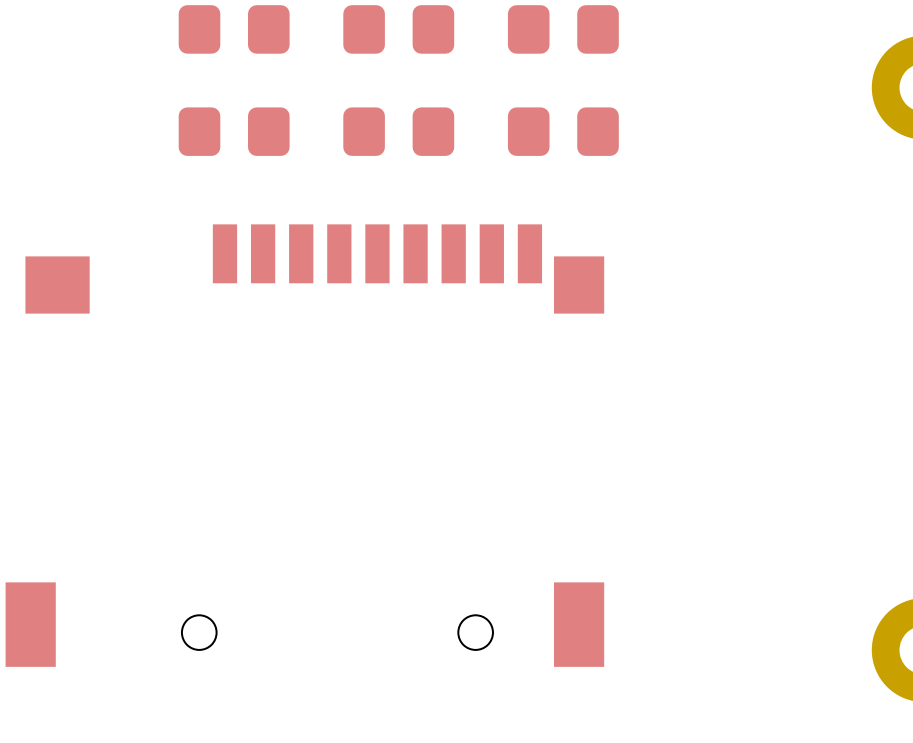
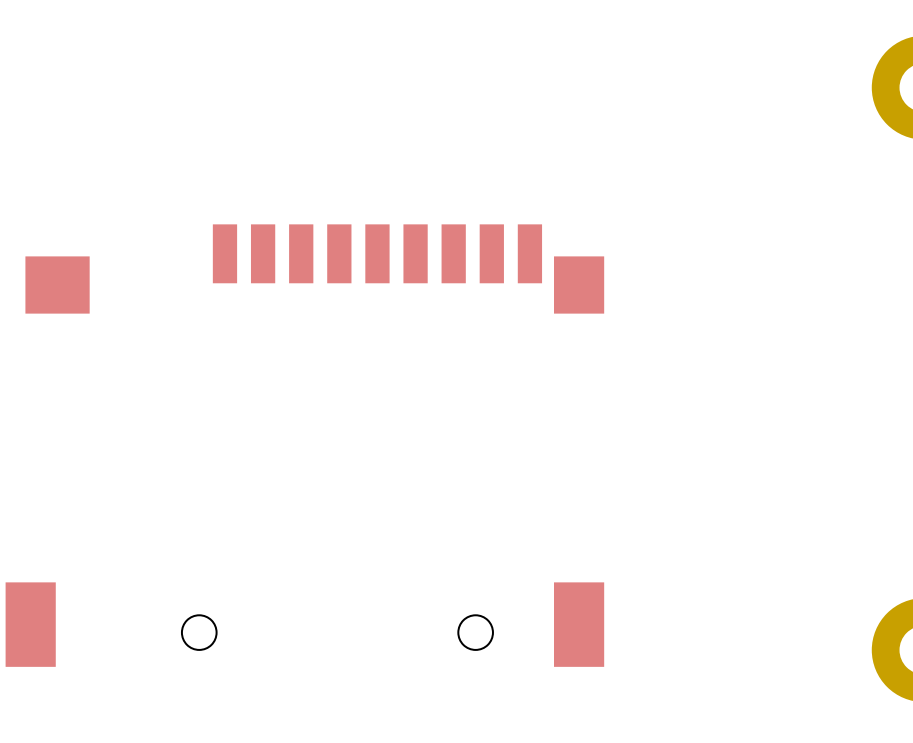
part: (234, 29) -> none
part: (398, 29) -> none
part: (563, 29) -> none
part: (234, 131) -> none
part: (398, 131) -> none
part: (563, 131) -> none

